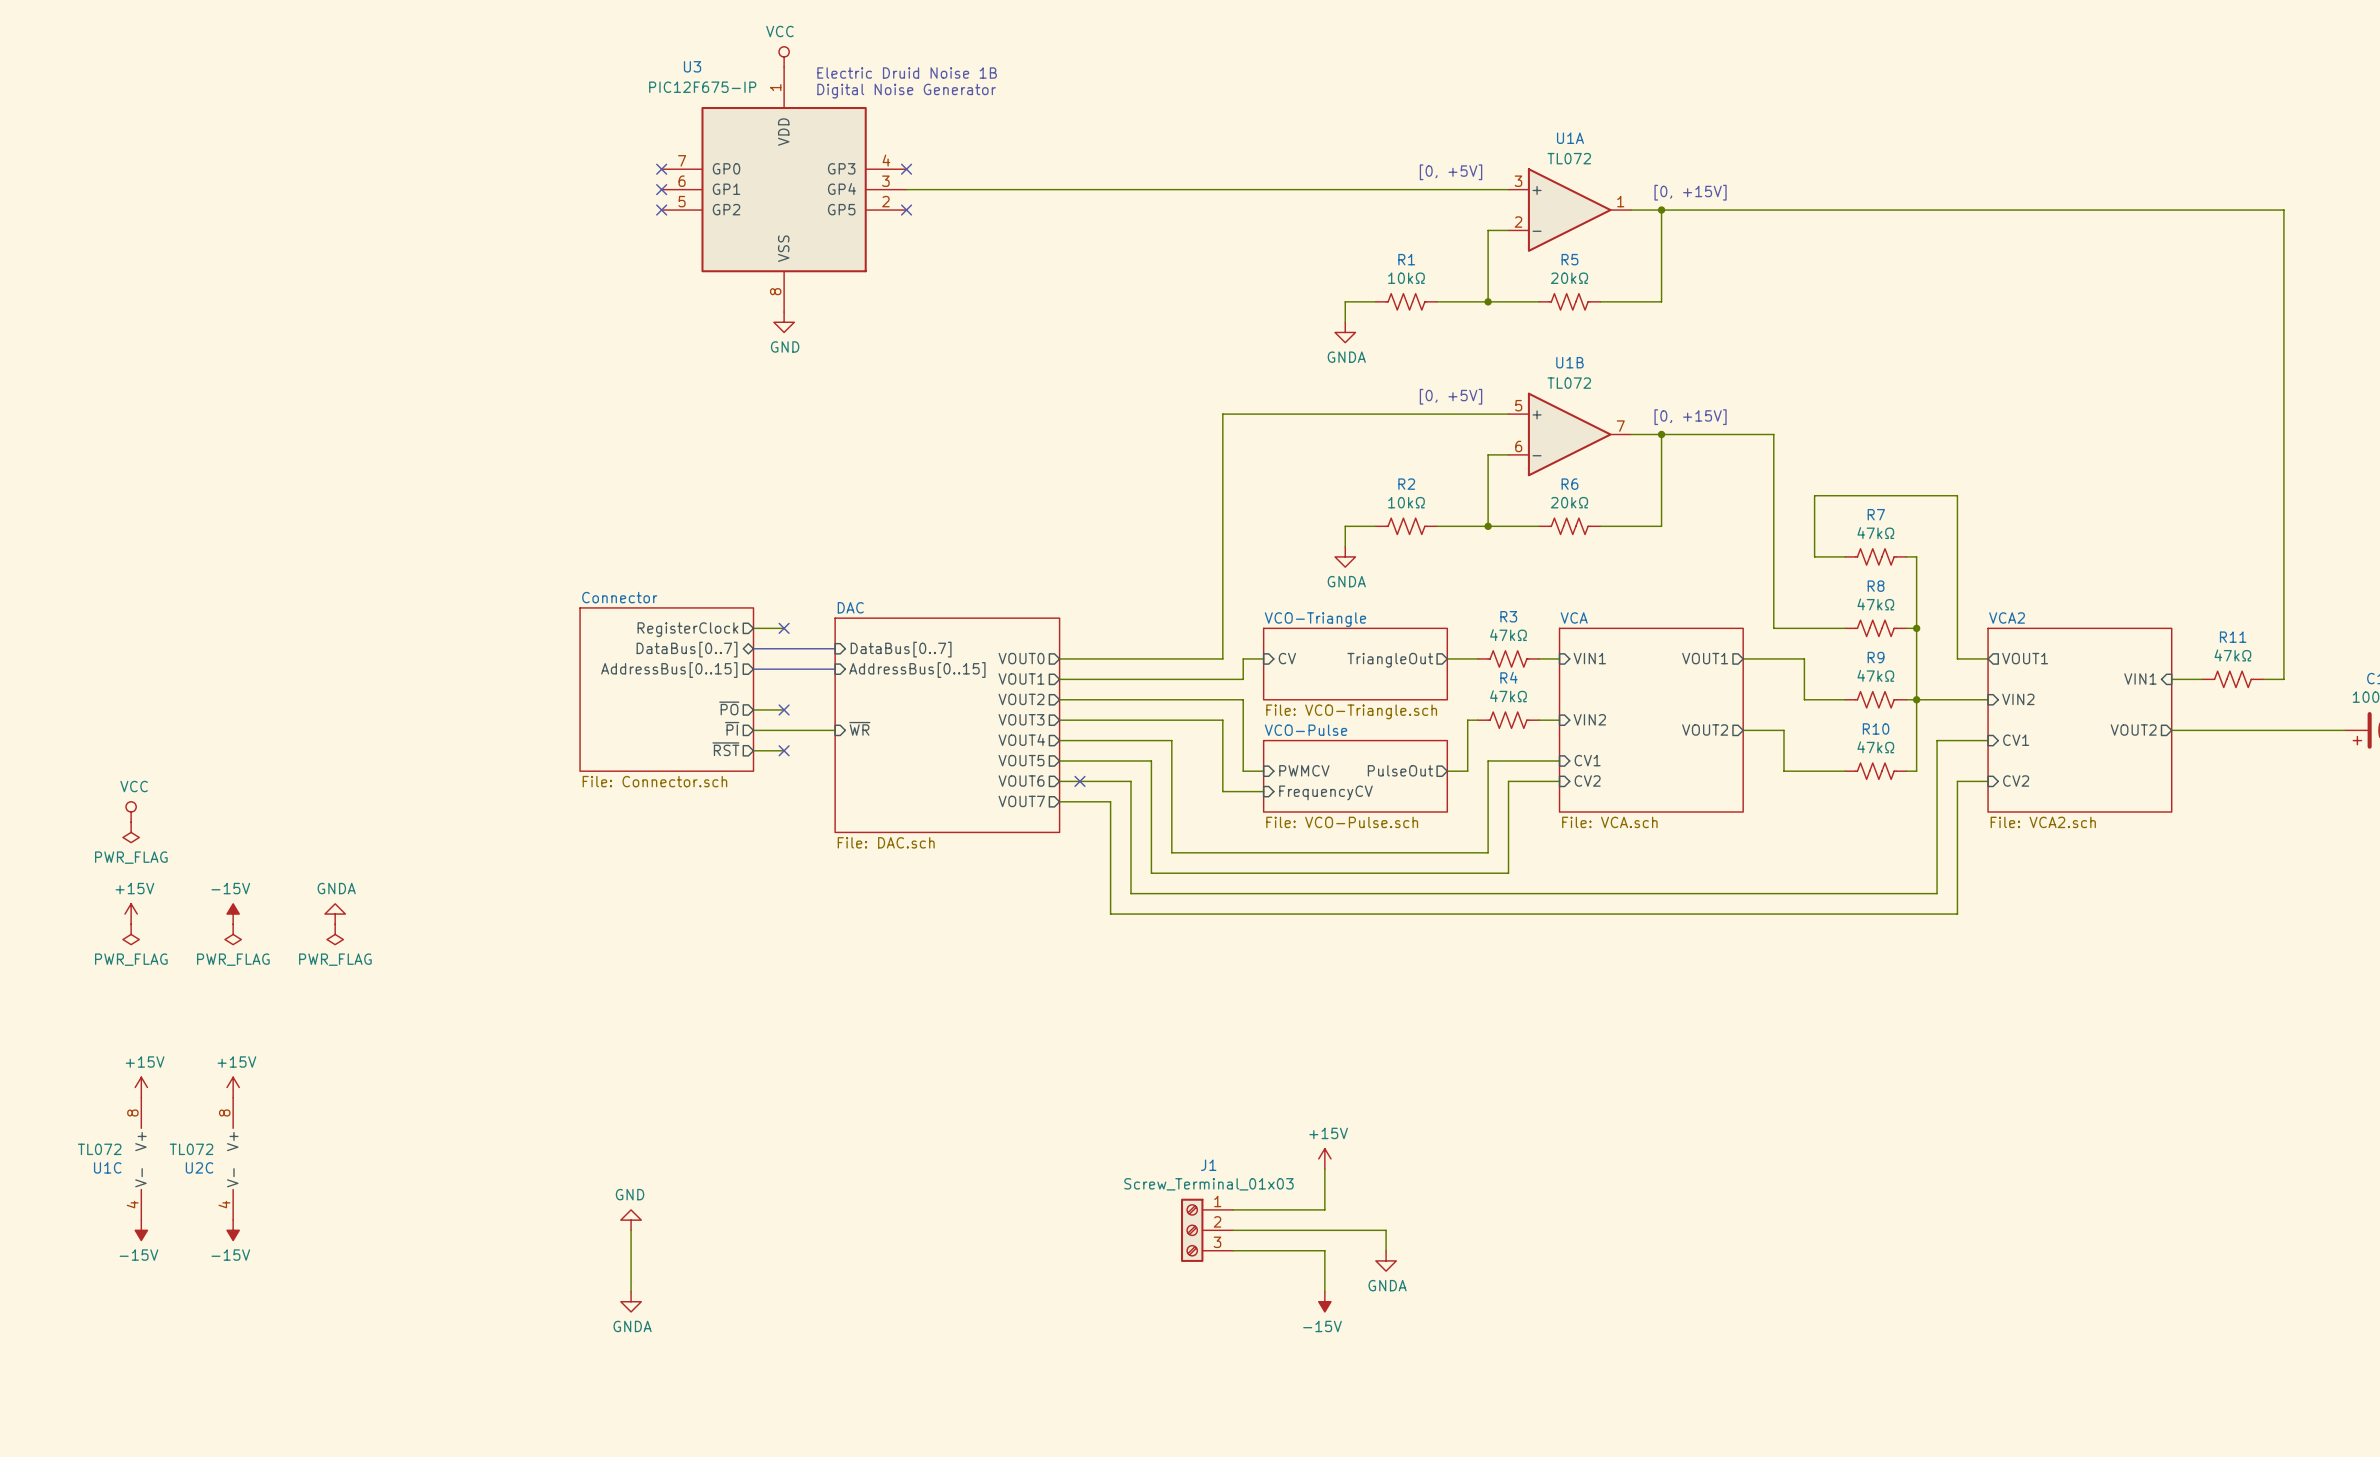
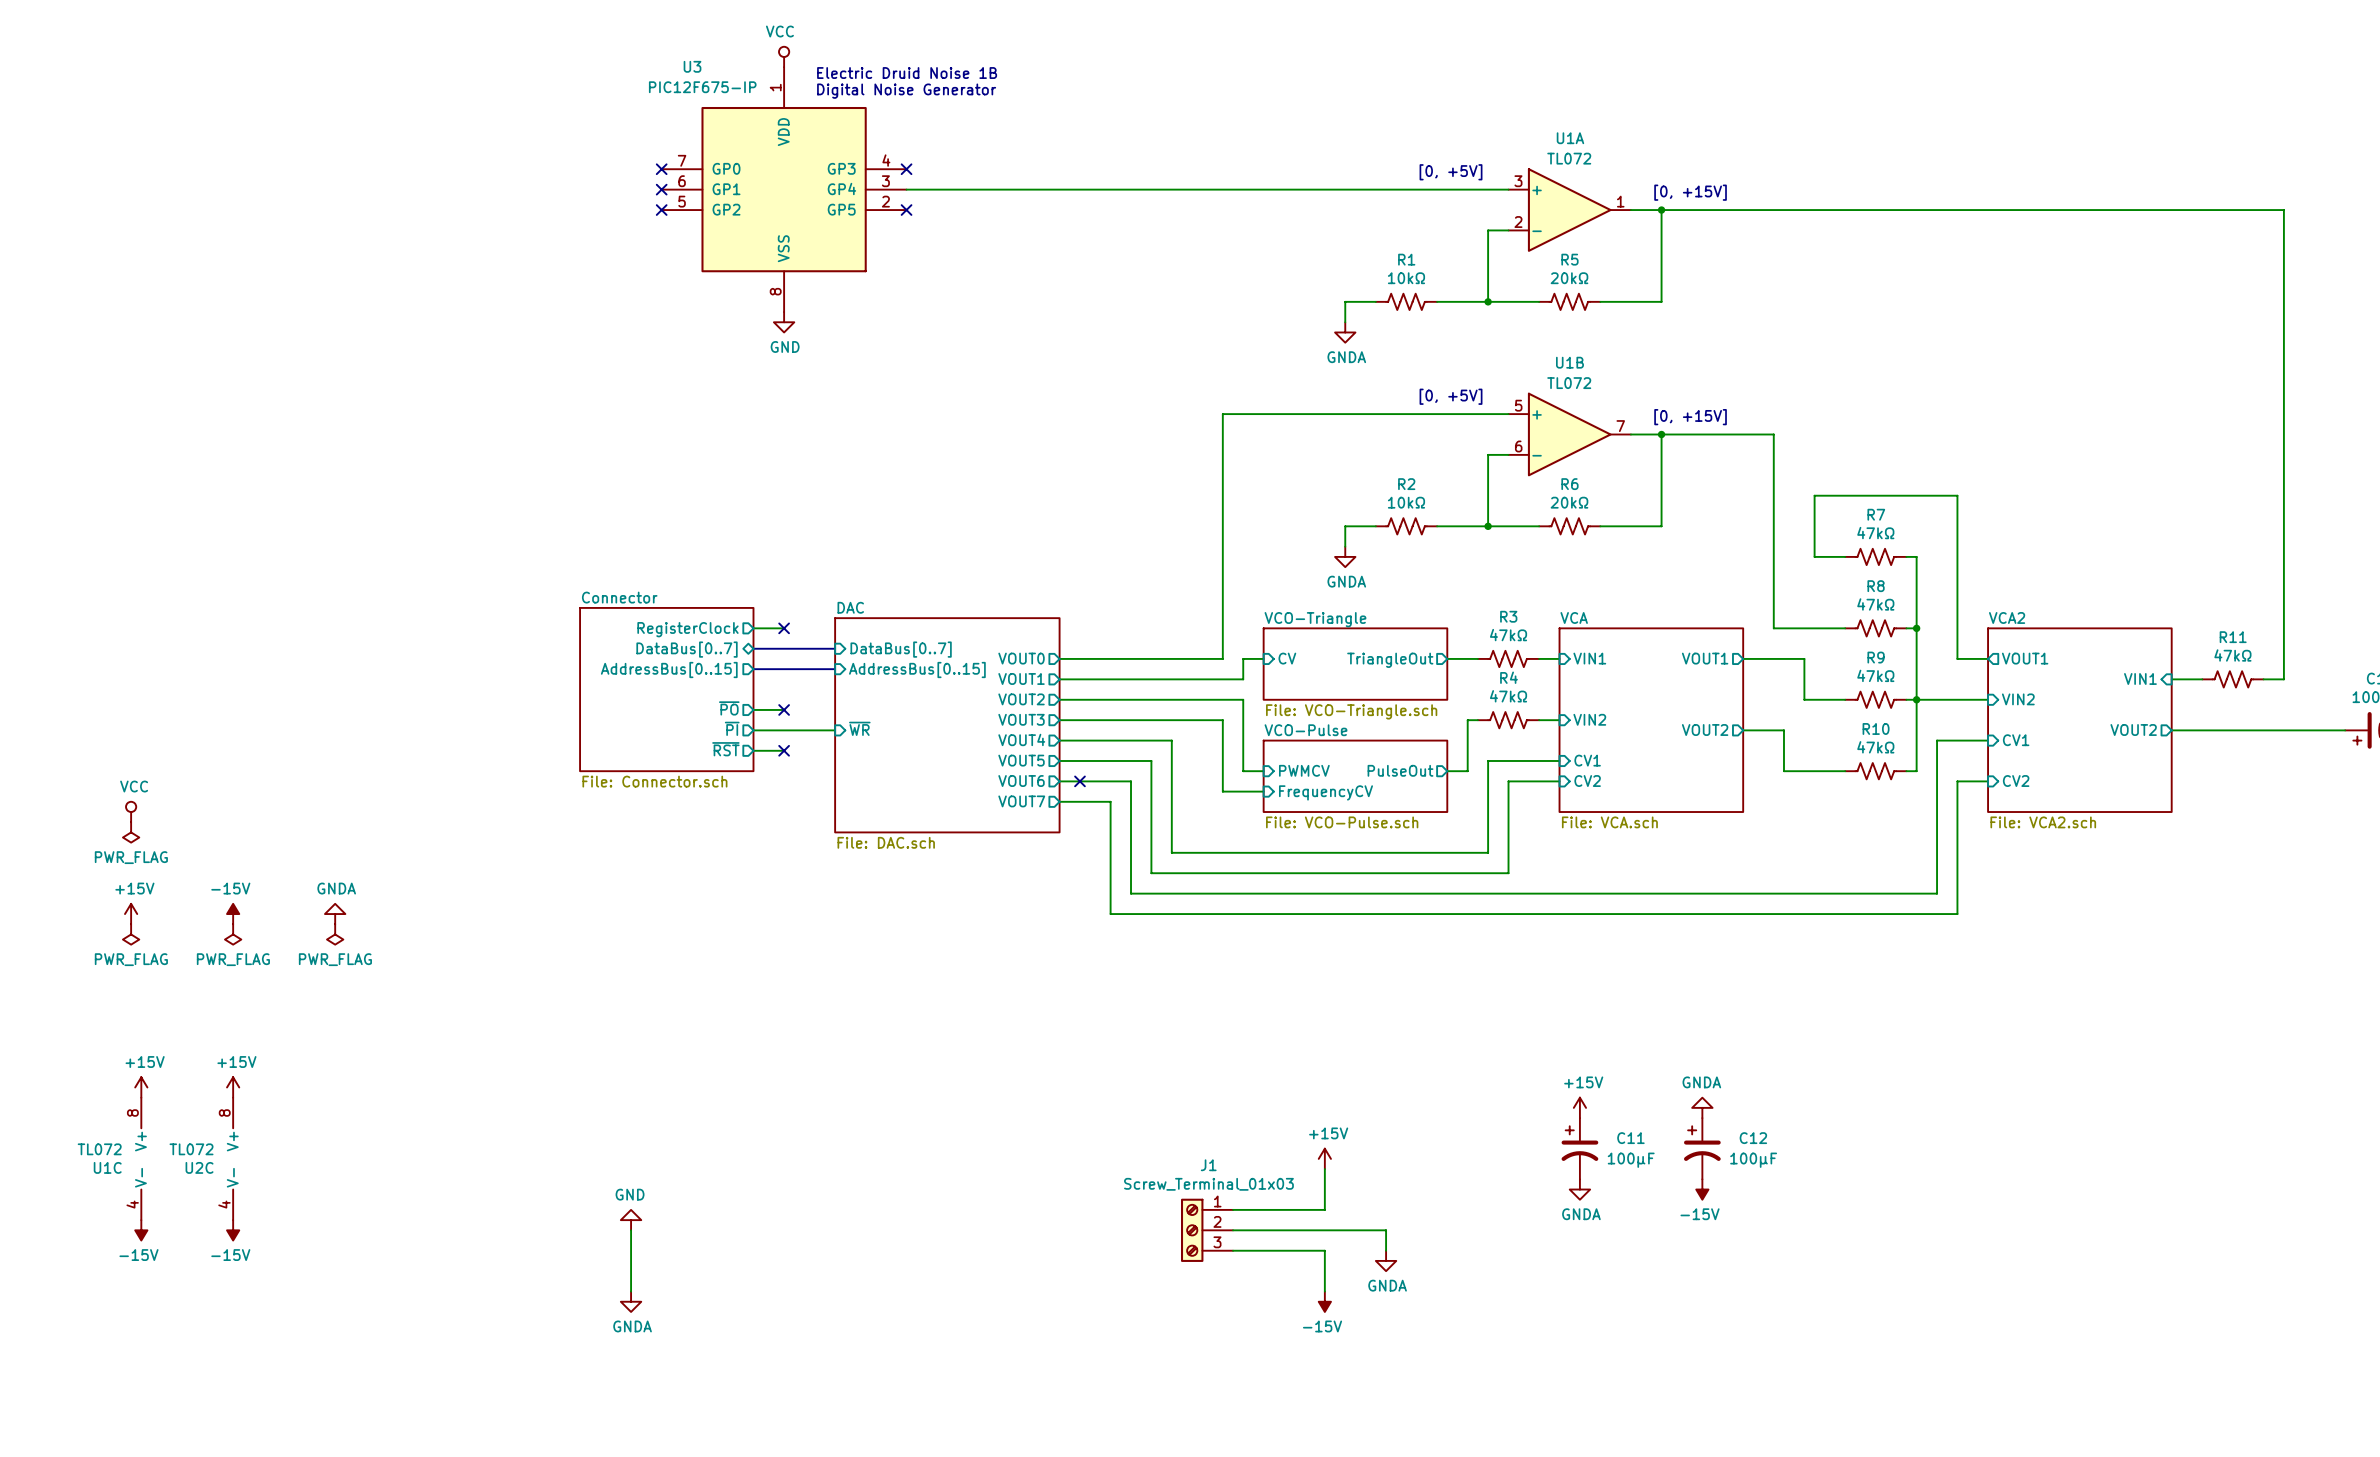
power symbol: none -> +15V (1579, 1107)
power symbol: none -> GNDA (1702, 1107)
C11: none -> 100µF (1579, 1148)
C12: none -> 100µF (1702, 1148)
power symbol: none -> GNDA (1579, 1189)
power symbol: none -> -15V (1702, 1189)

